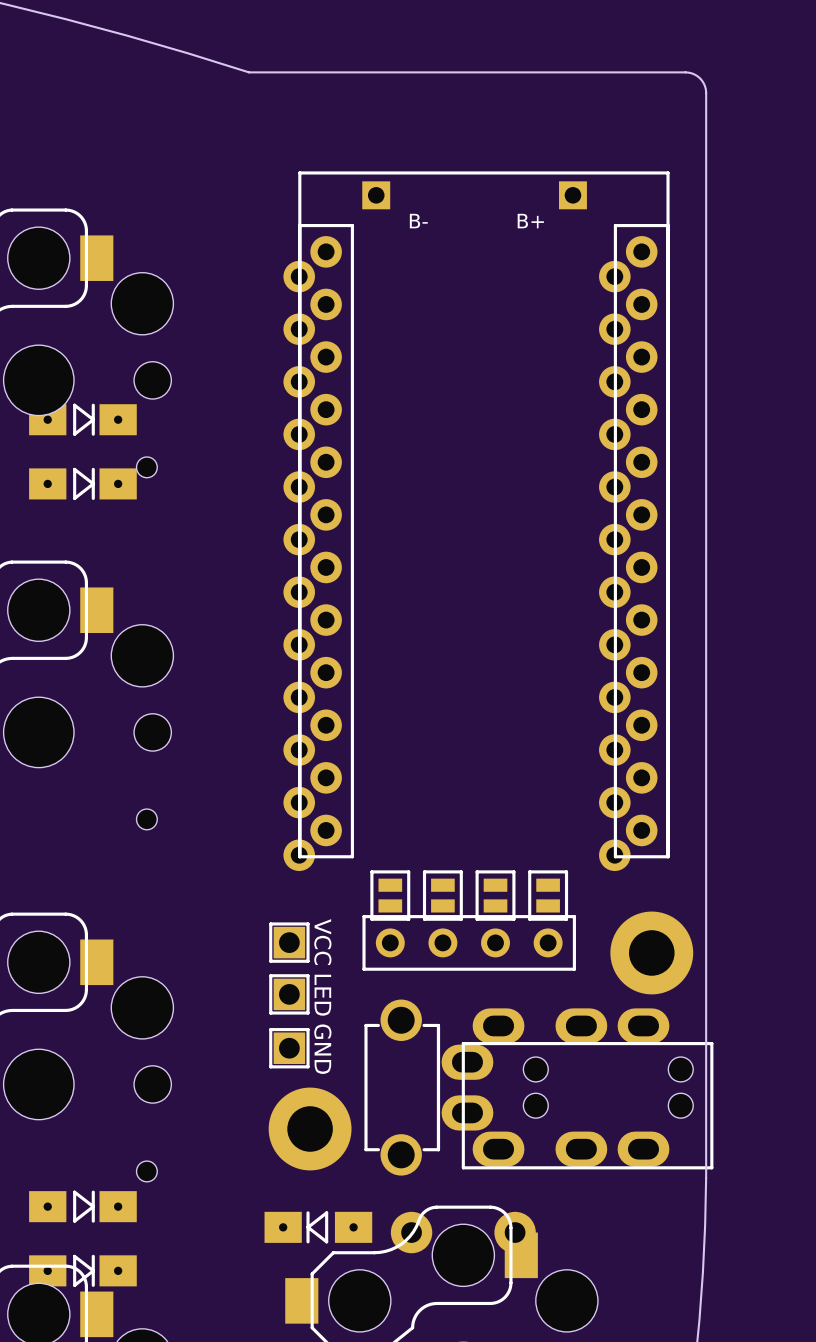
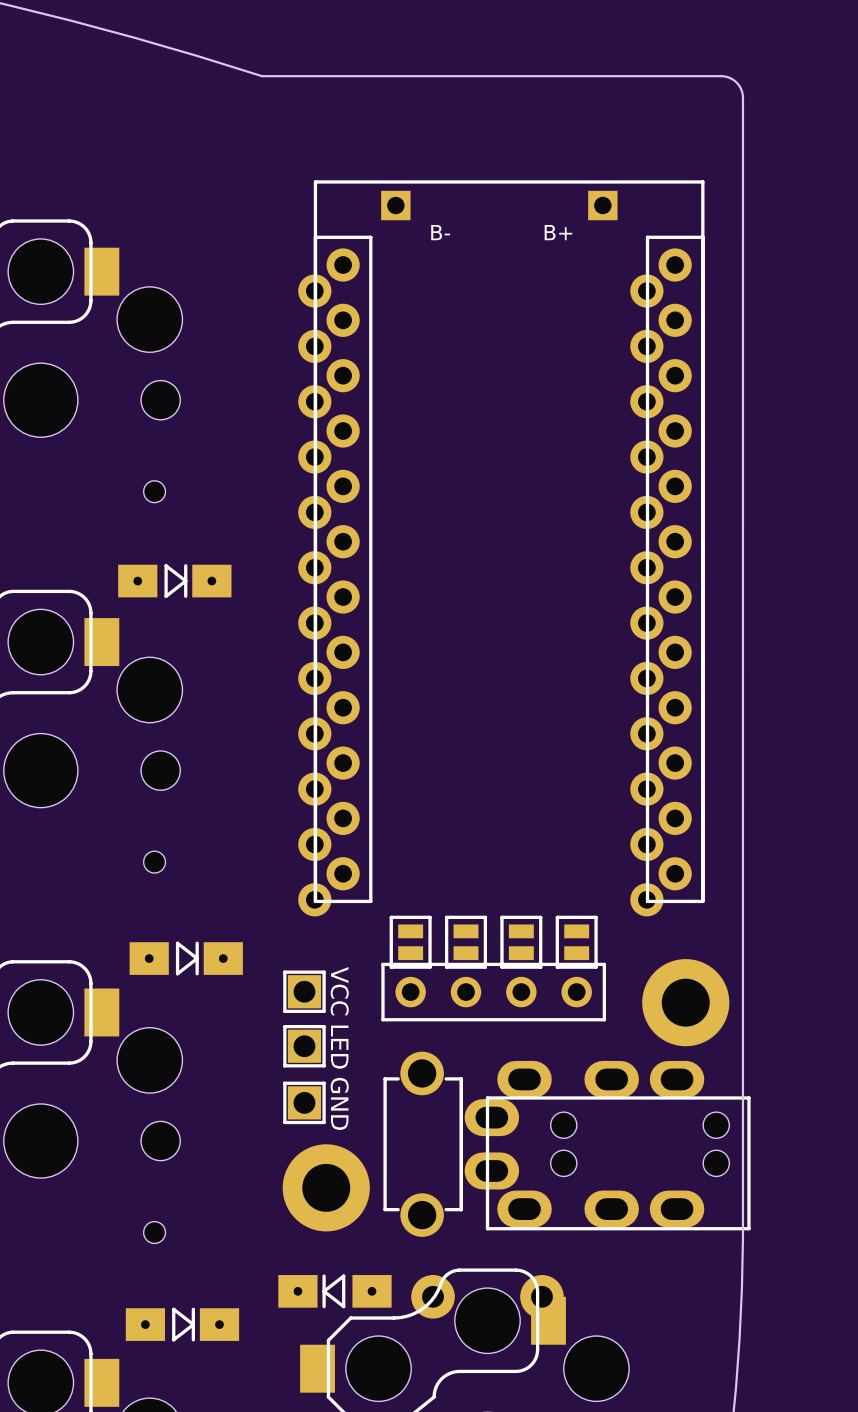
part: (82, 419) -> none
part: (82, 483) -> none
part: none -> (174, 581)
part: none -> (186, 958)
part: (82, 1206) -> none
part: none -> (182, 1324)
part: (82, 1270) -> none

